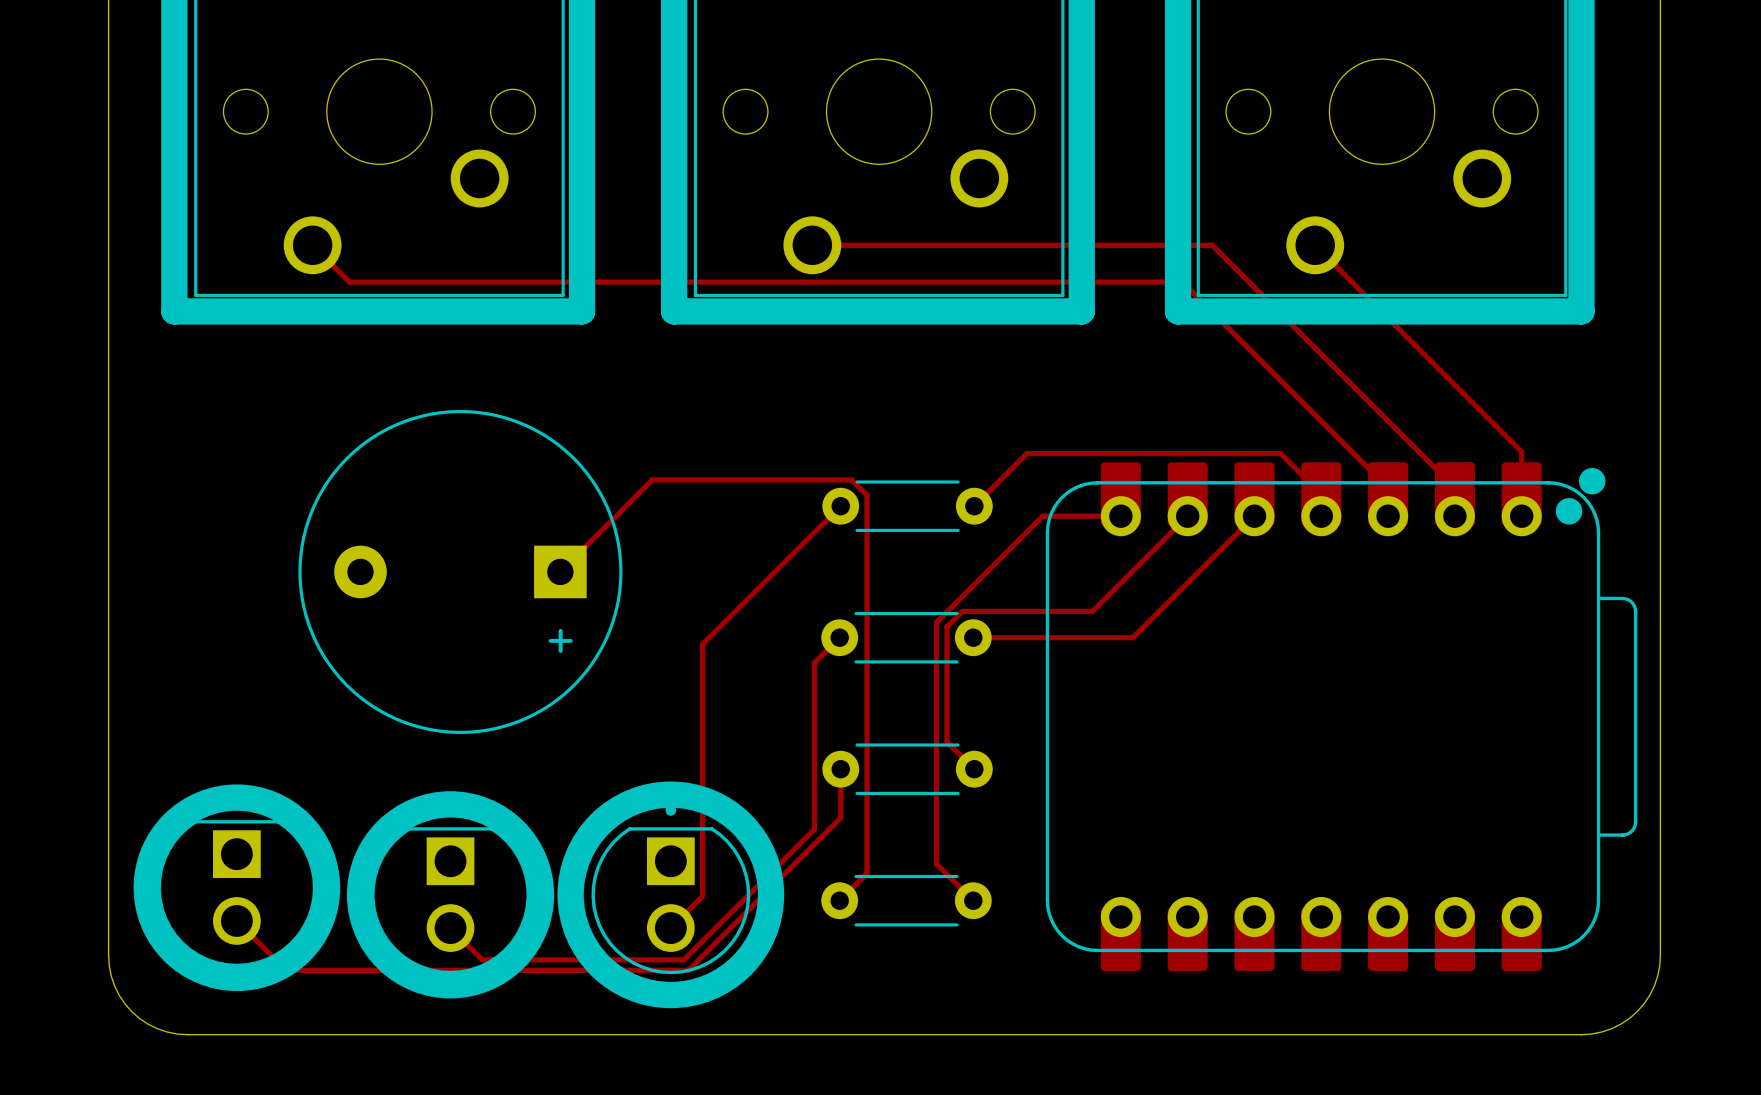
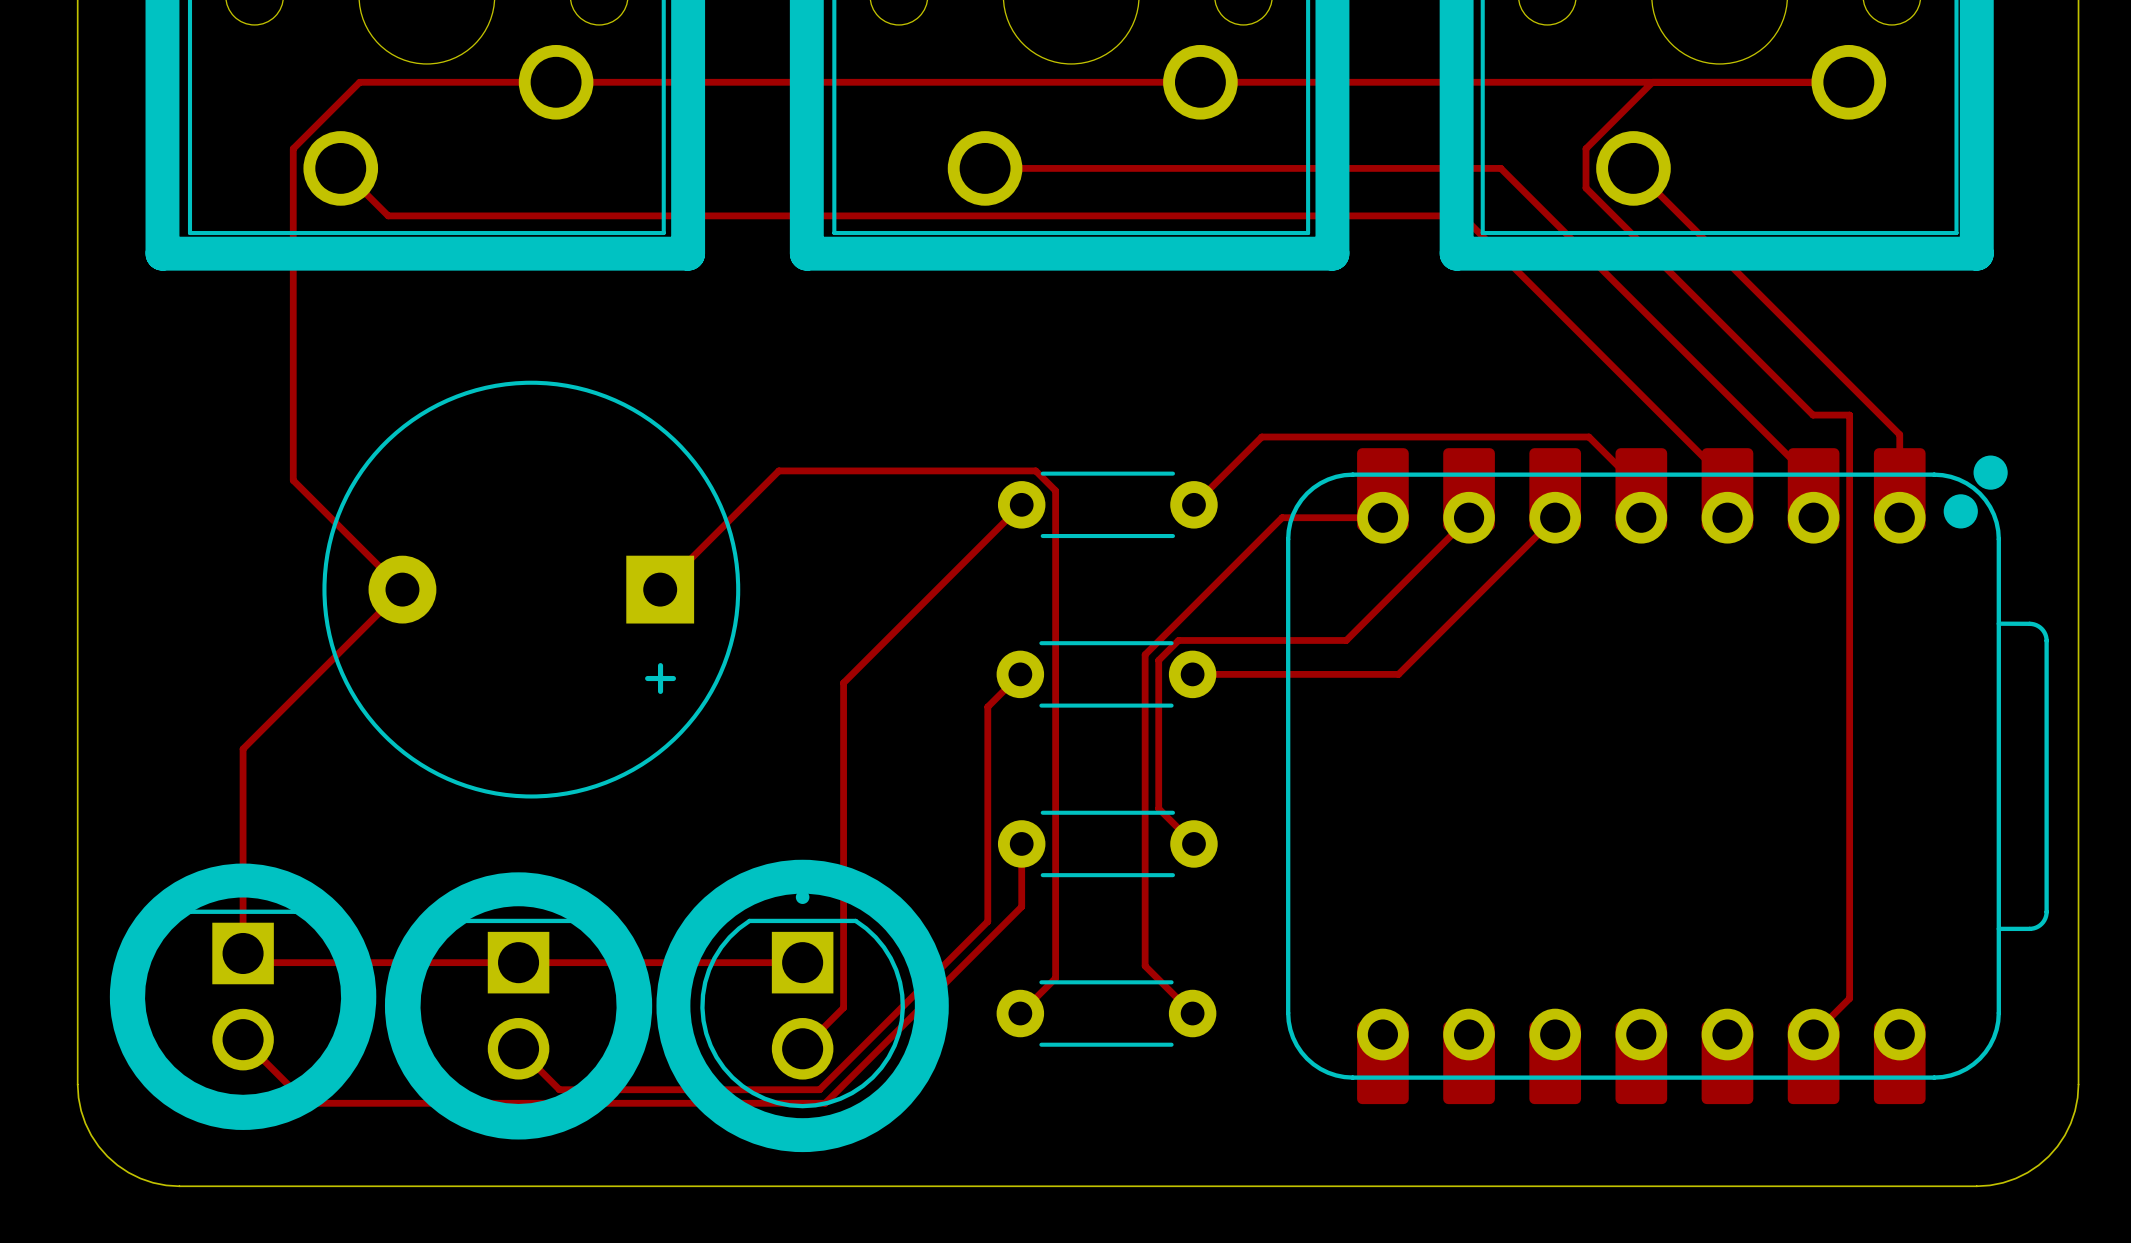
track: none -> (1652, 82) (1586, 148) (1586, 188) (1813, 415) (1849, 415) (1849, 998) (1813, 1034)
track: none -> (1848, 82) (359, 82) (293, 148) (293, 480) (402, 589) (243, 749) (243, 953)
track: none -> (252, 962) (802, 962)

